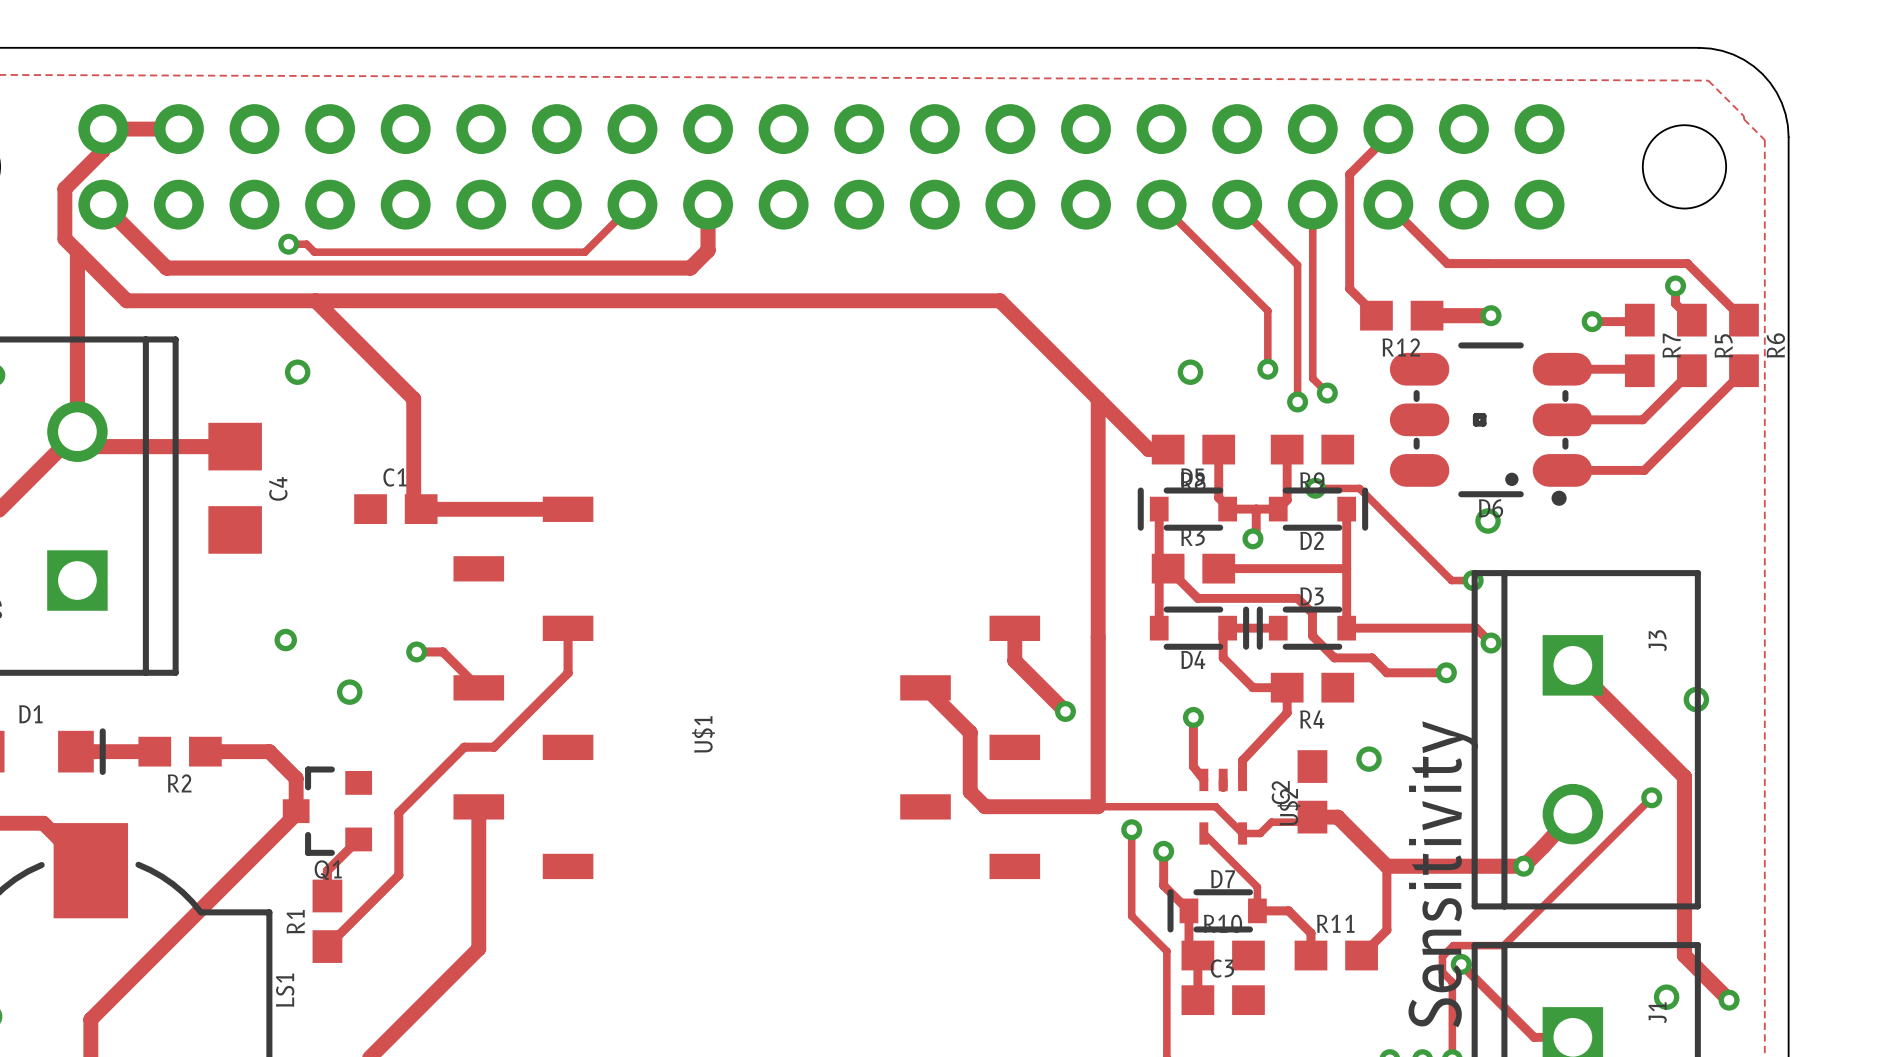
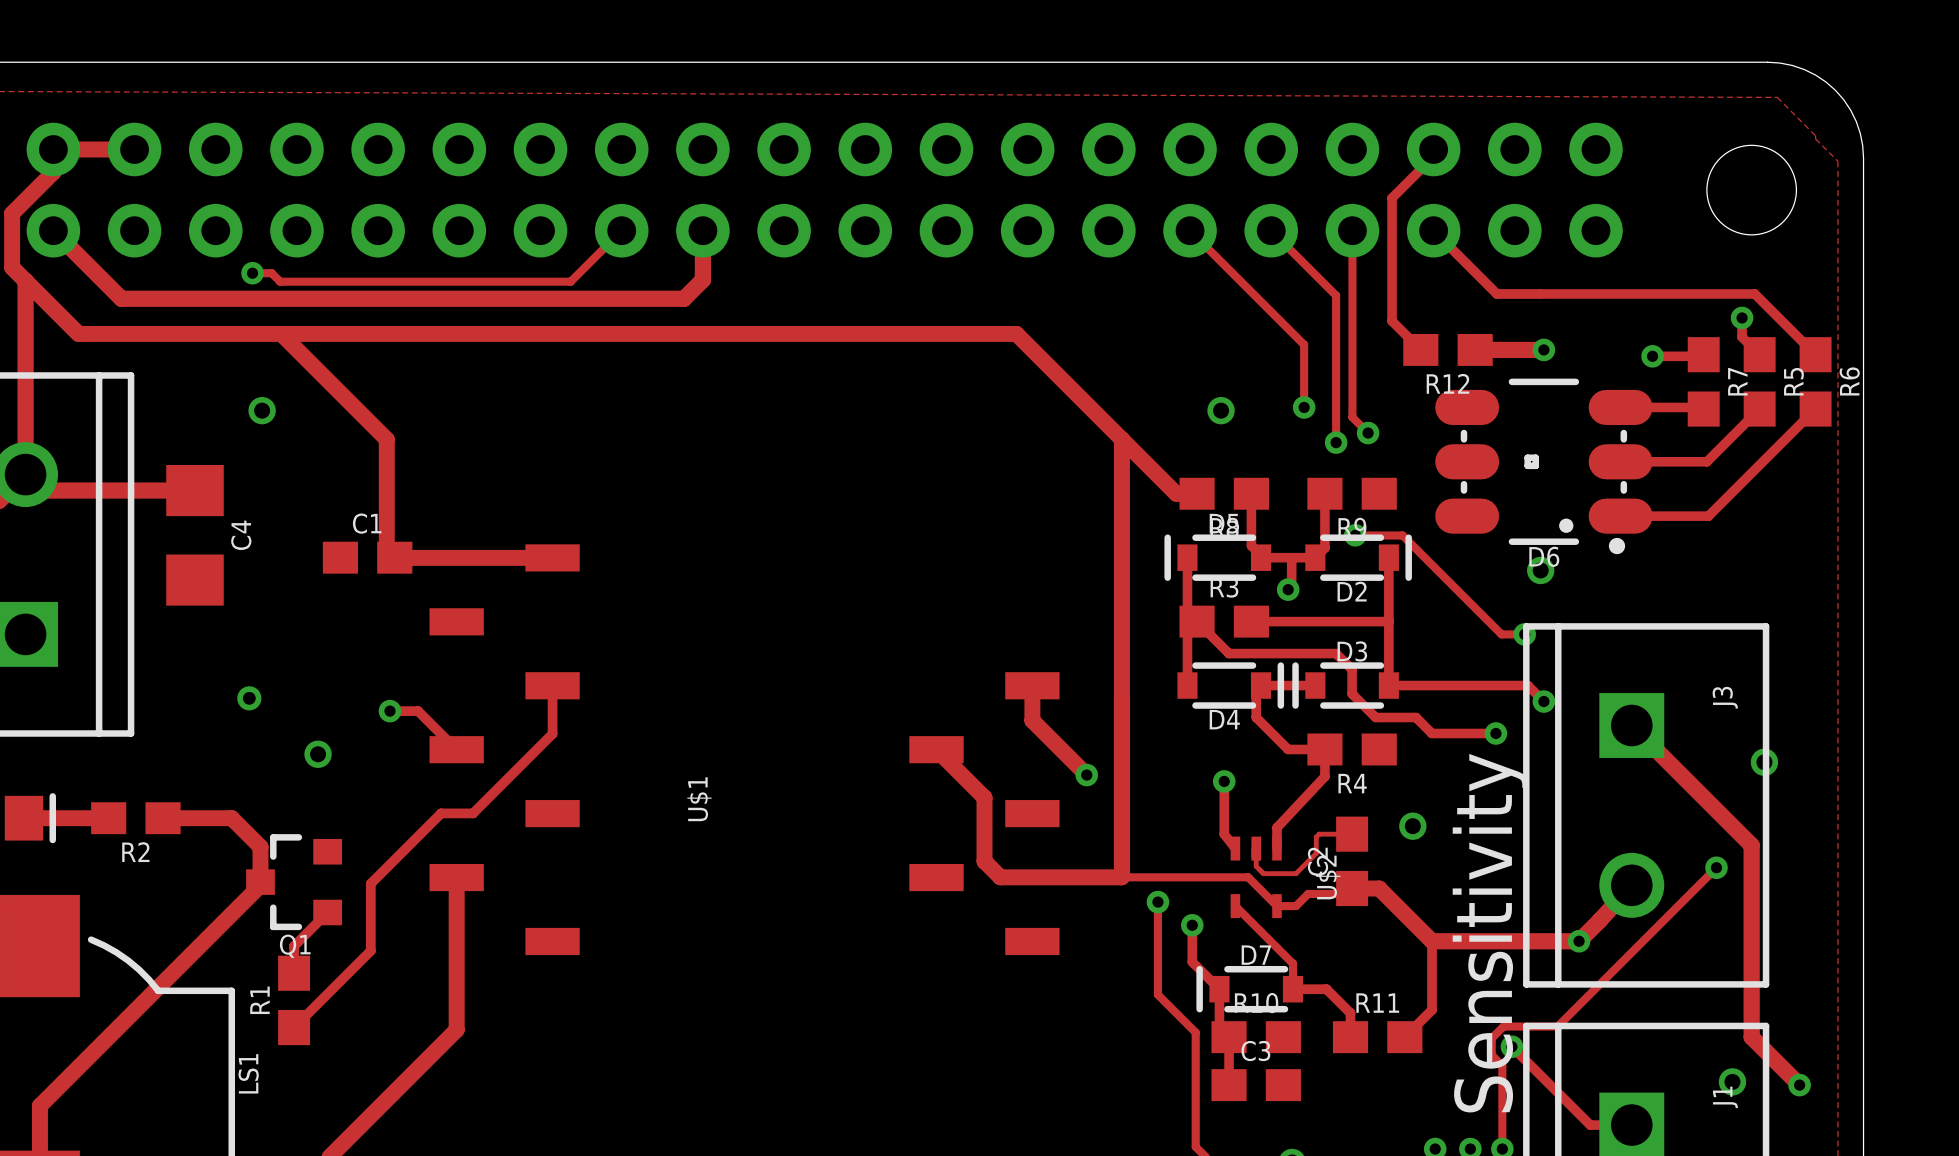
track: none -> (1352, 834) (1319, 834) (1316, 837) (1316, 853) (1295, 873) (1263, 873) (1256, 866) (1256, 848)

